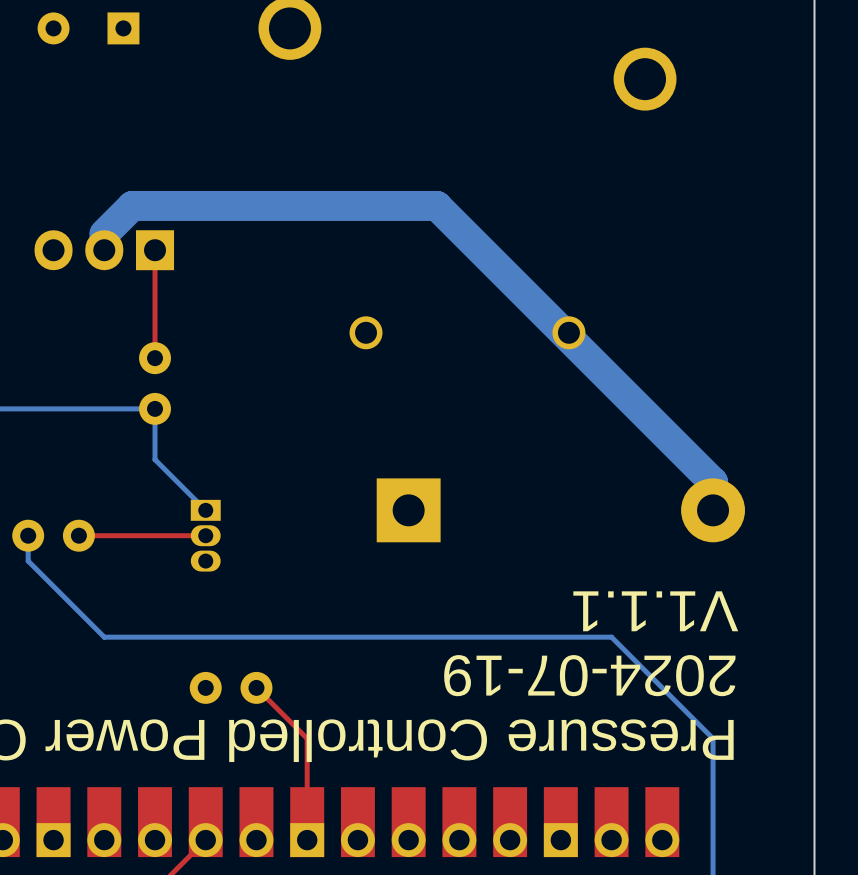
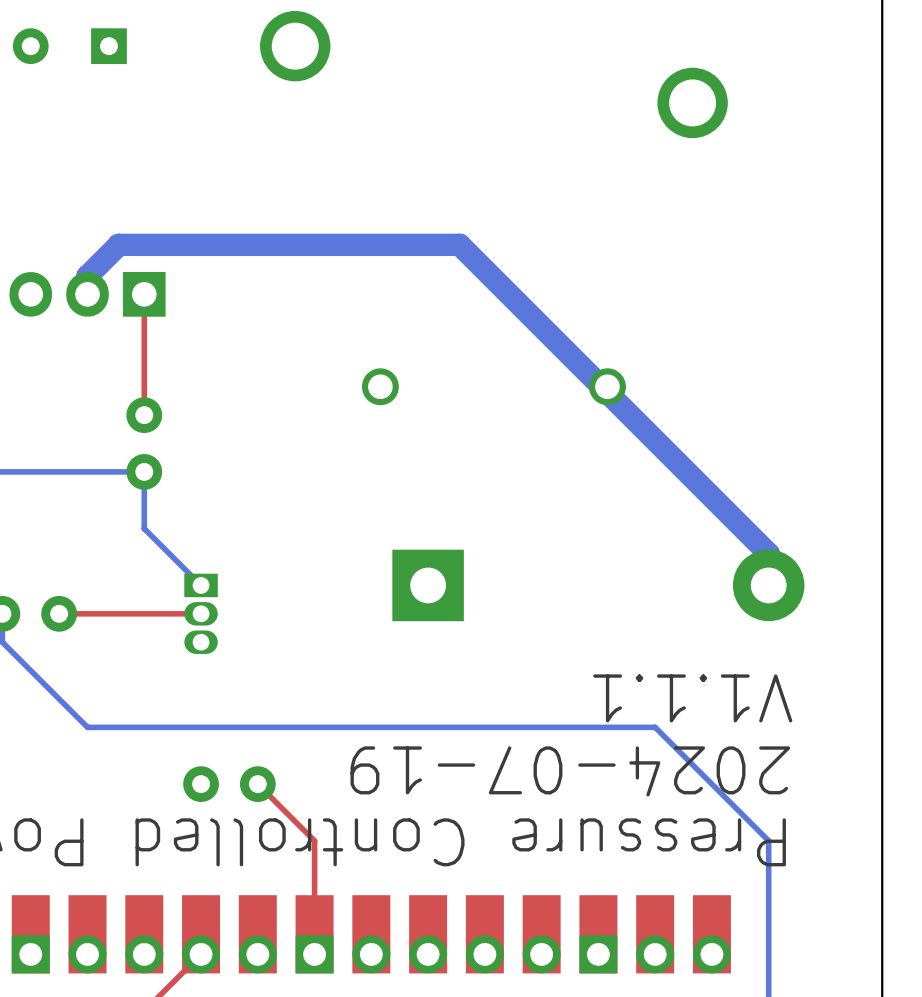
bottom track width: thick (104, 233) (132, 205) (436, 205) (713, 482) (713, 510) -> thin (87, 276) (118, 244) (459, 244) (768, 553) (768, 585)

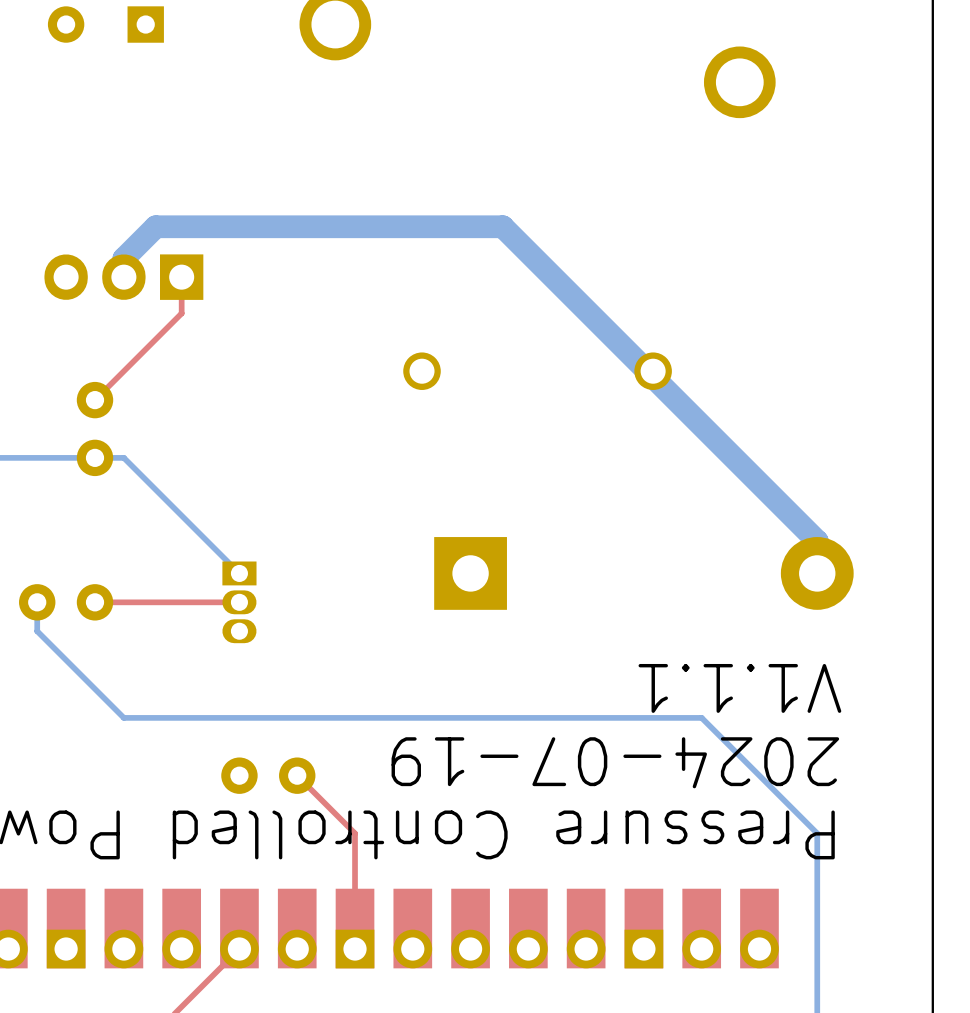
top track: (144, 330) (144, 415) -> (181, 313) (95, 400)
part position: (144, 443) -> (95, 428)
bottom track: (87, 471) (144, 471) (144, 528) -> (123, 457) (181, 515)

